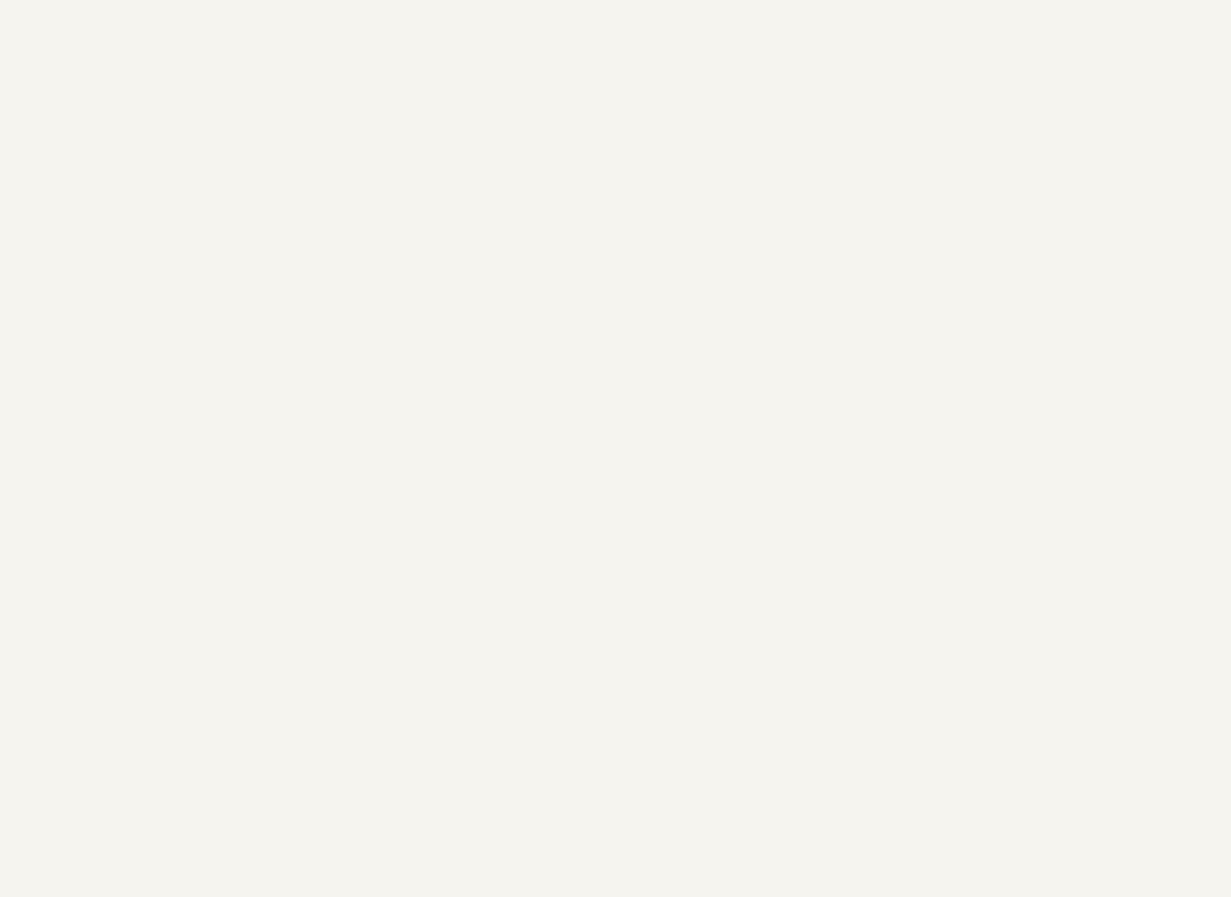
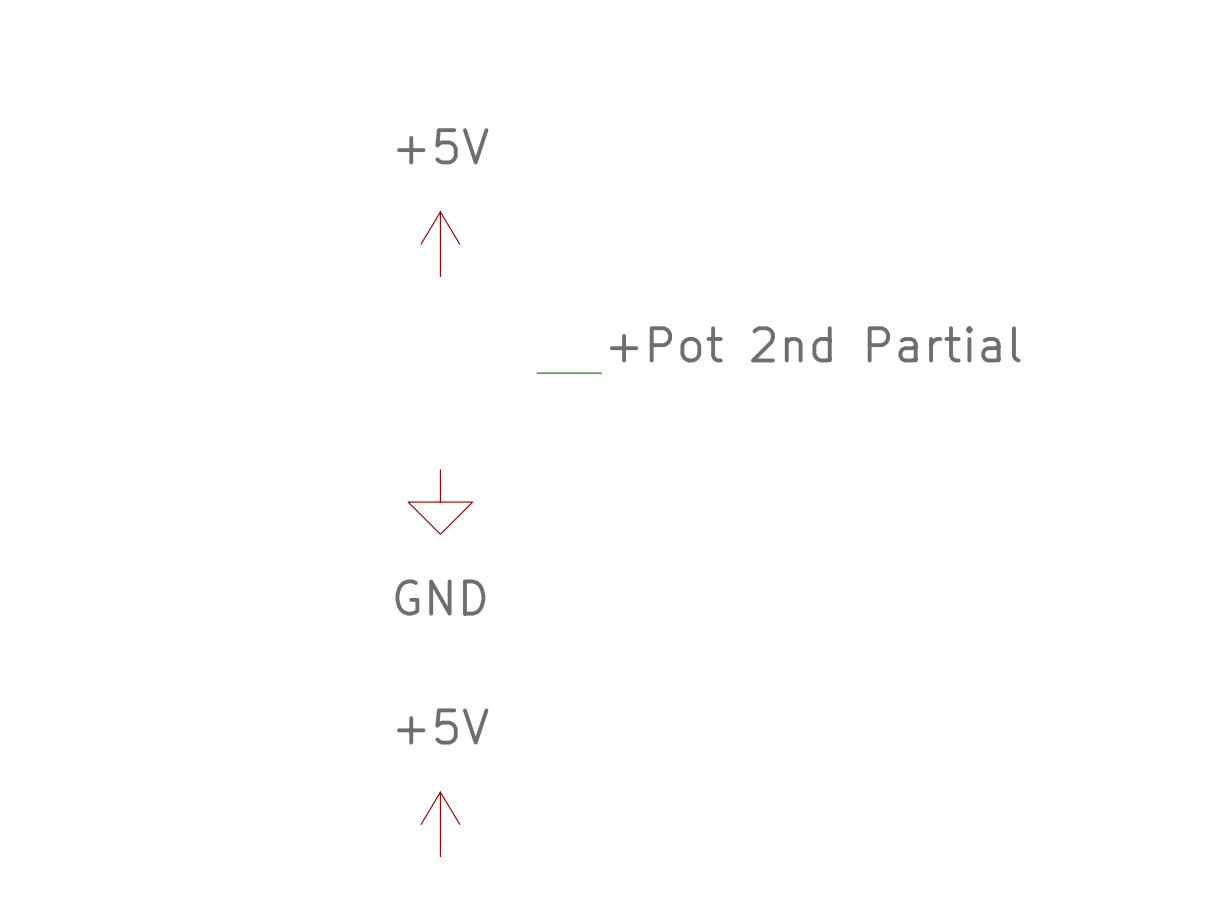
power symbol: none -> +5V (440, 244)
label: none -> +Pot 2nd Partial (815, 344)
wire: none -> (537, 373) (601, 373)
power symbol: none -> GND (440, 502)
power symbol: none -> +5V (440, 824)

